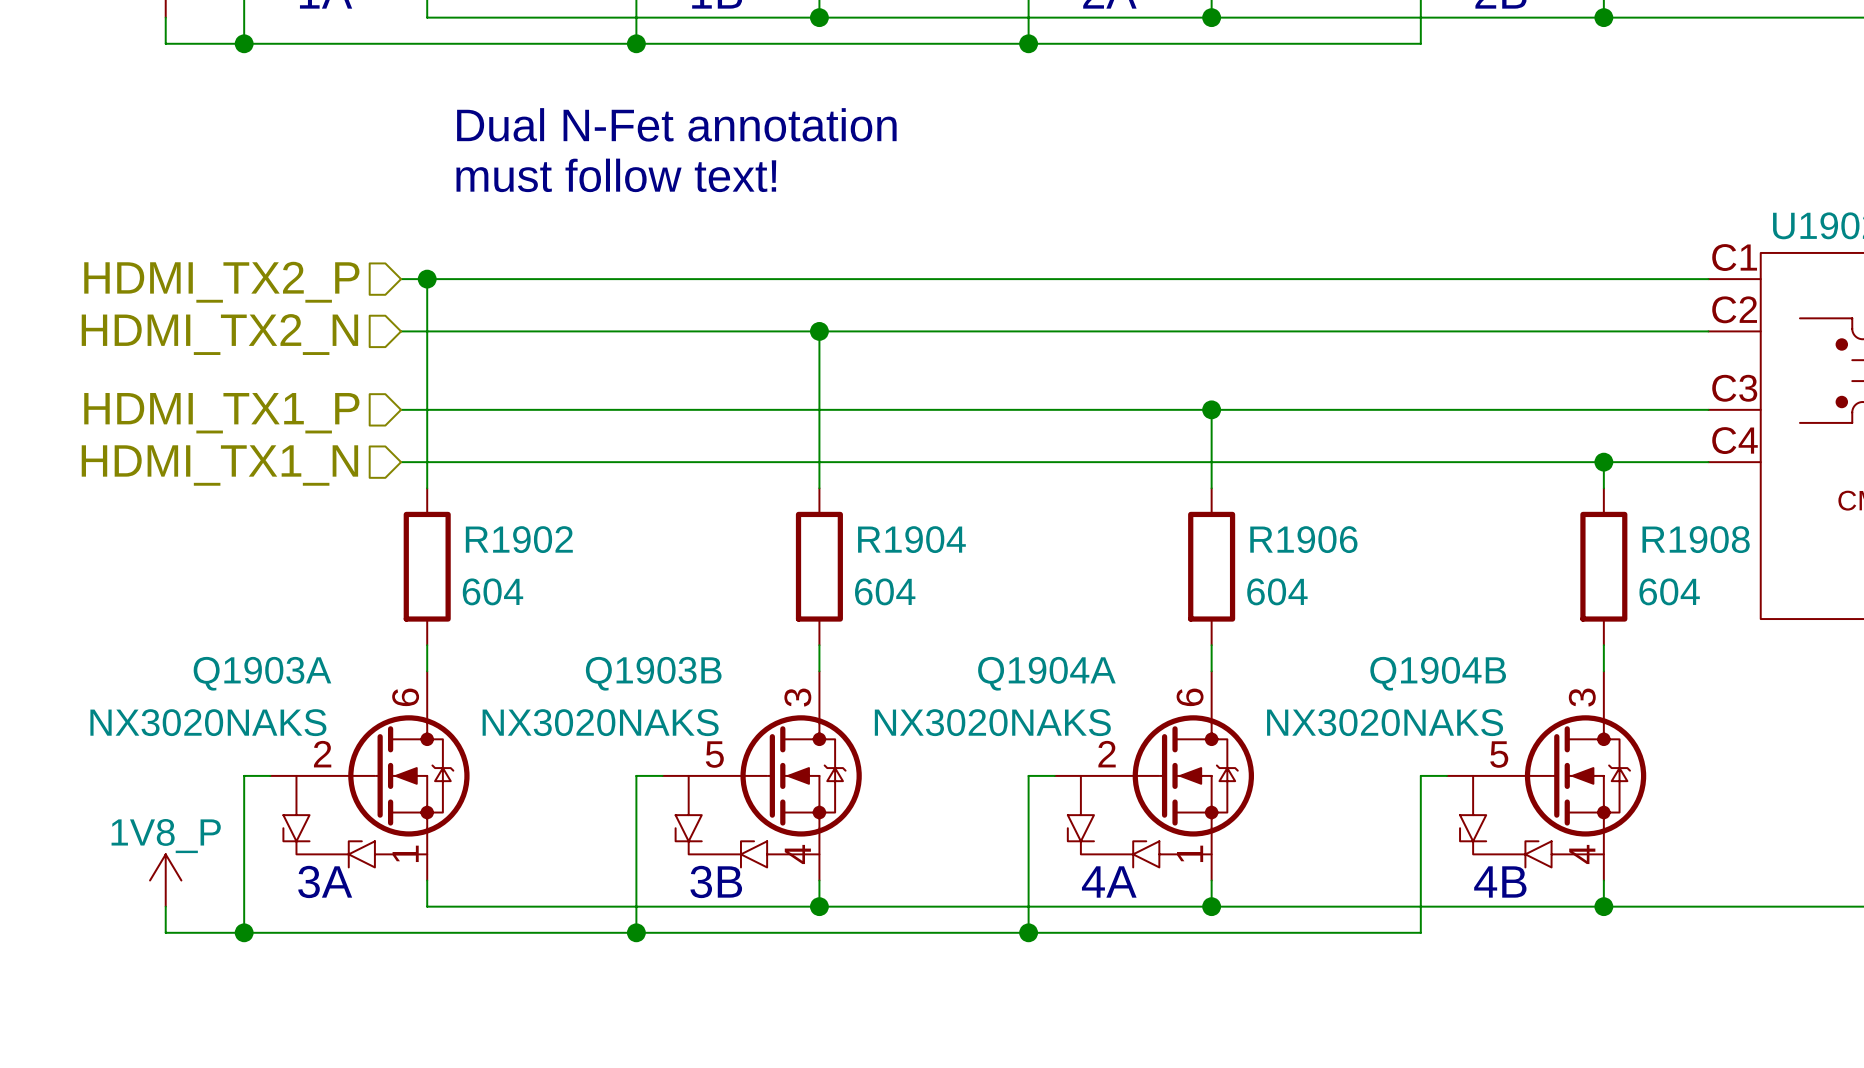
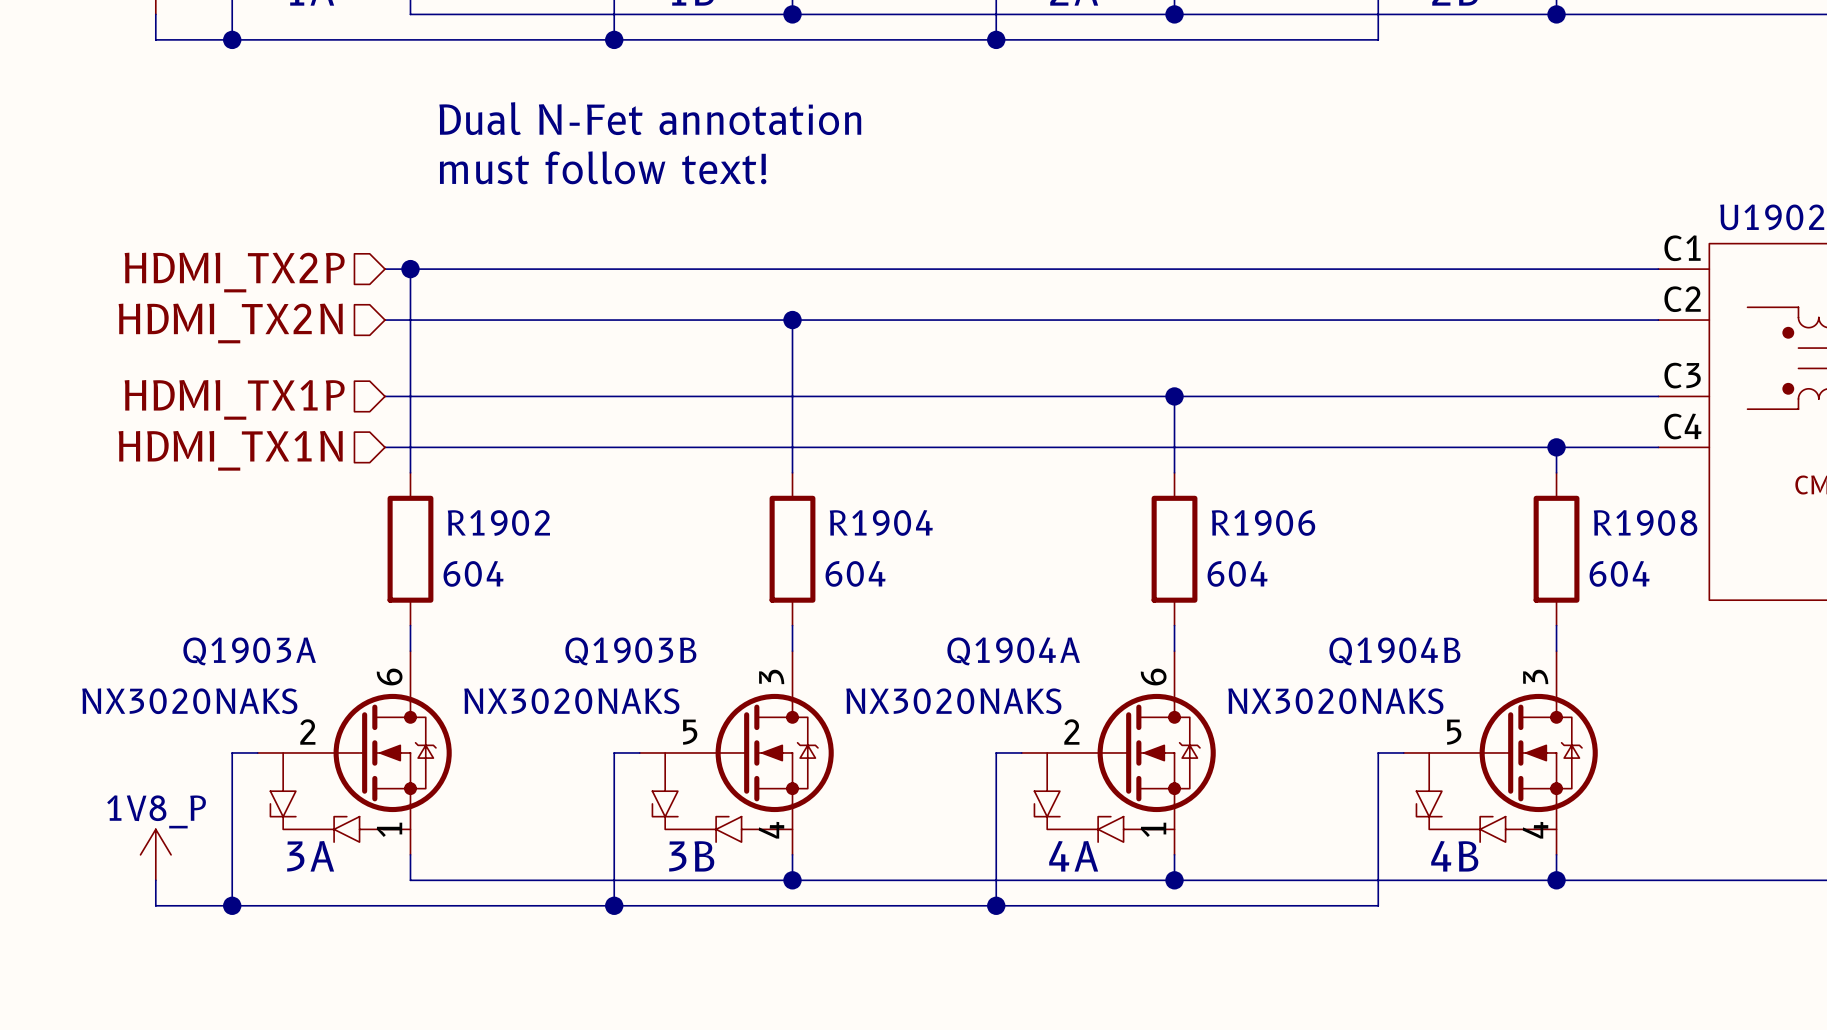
hierarchical label: HDMI_TX2_P (221, 282) -> HDMI_TX2P (234, 272)
hierarchical label: HDMI_TX2_N (219, 334) -> HDMI_TX2N (230, 323)
hierarchical label: HDMI_TX1_P (221, 413) -> HDMI_TX1P (234, 399)
hierarchical label: HDMI_TX1_N (219, 465) -> HDMI_TX1N (230, 450)

